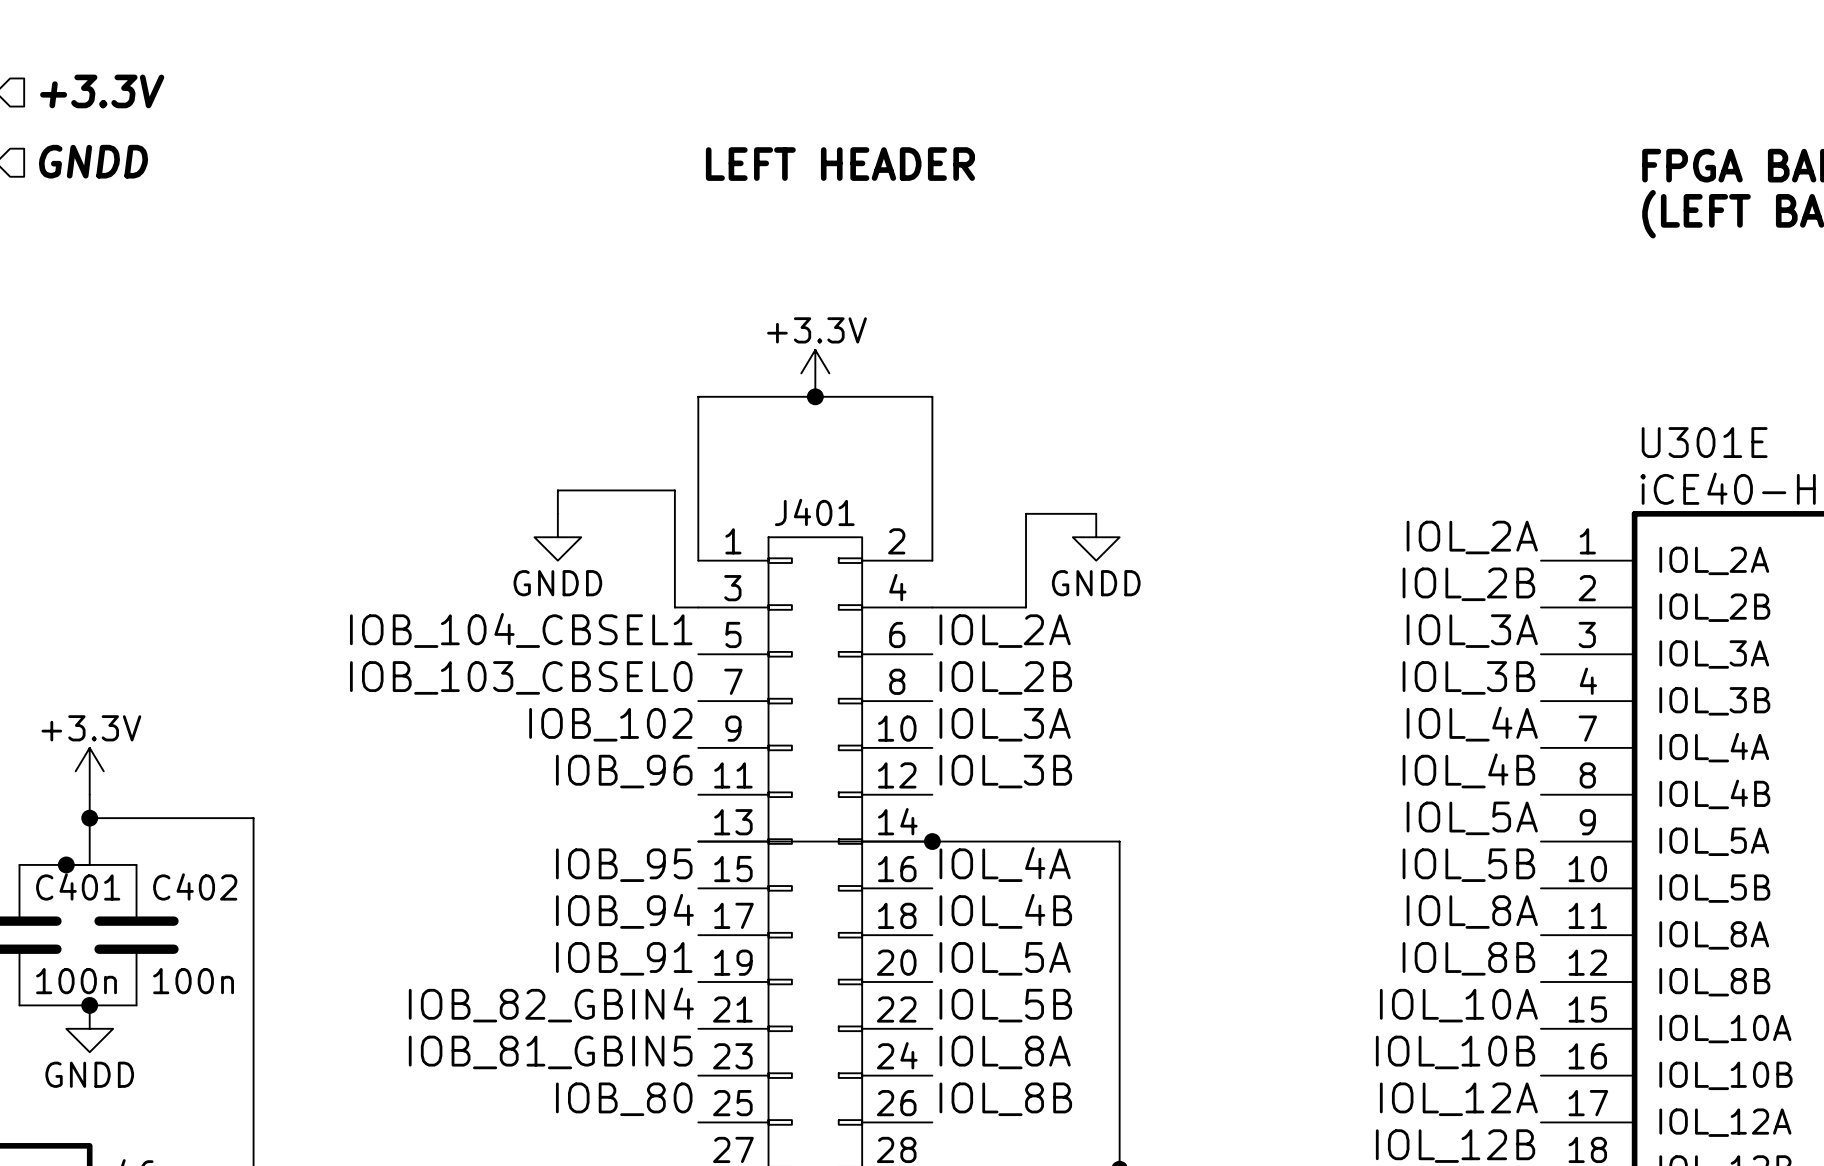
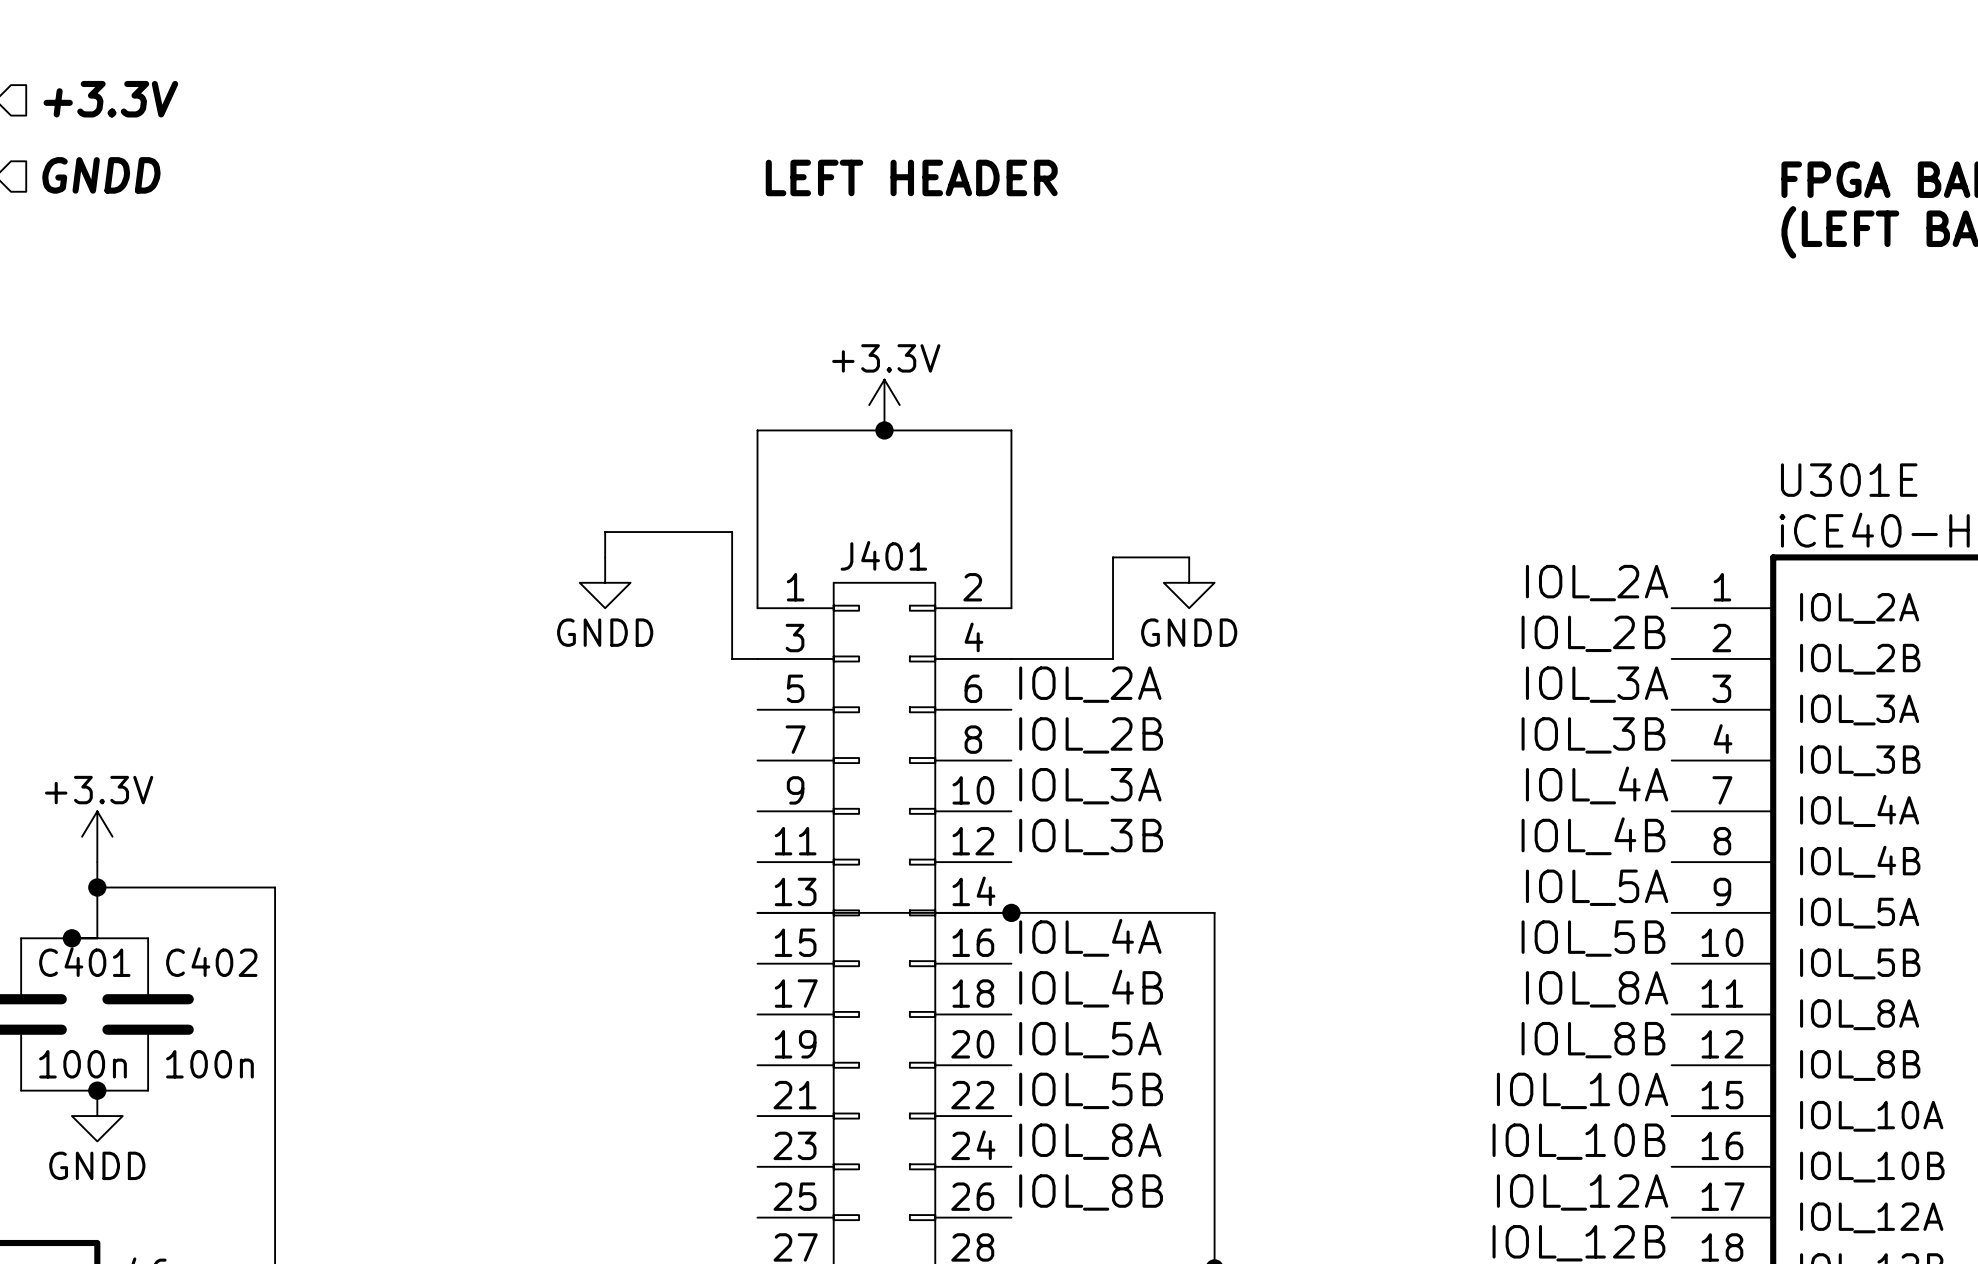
label: IOB_104_CBSEL1 (521, 630) -> none
label: IOB_103_CBSEL0 (521, 677) -> none
label: IOB_102 (610, 724) -> none
label: IOB_96 (624, 771) -> none
label: IOB_95 (624, 865) -> none
label: IOB_94 (624, 911) -> none
label: IOB_91 (624, 958) -> none
label: IOB_82_GBIN4 (551, 1004) -> none
label: IOB_81_GBIN5 (550, 1052) -> none
label: IOB_80 (624, 1099) -> none

